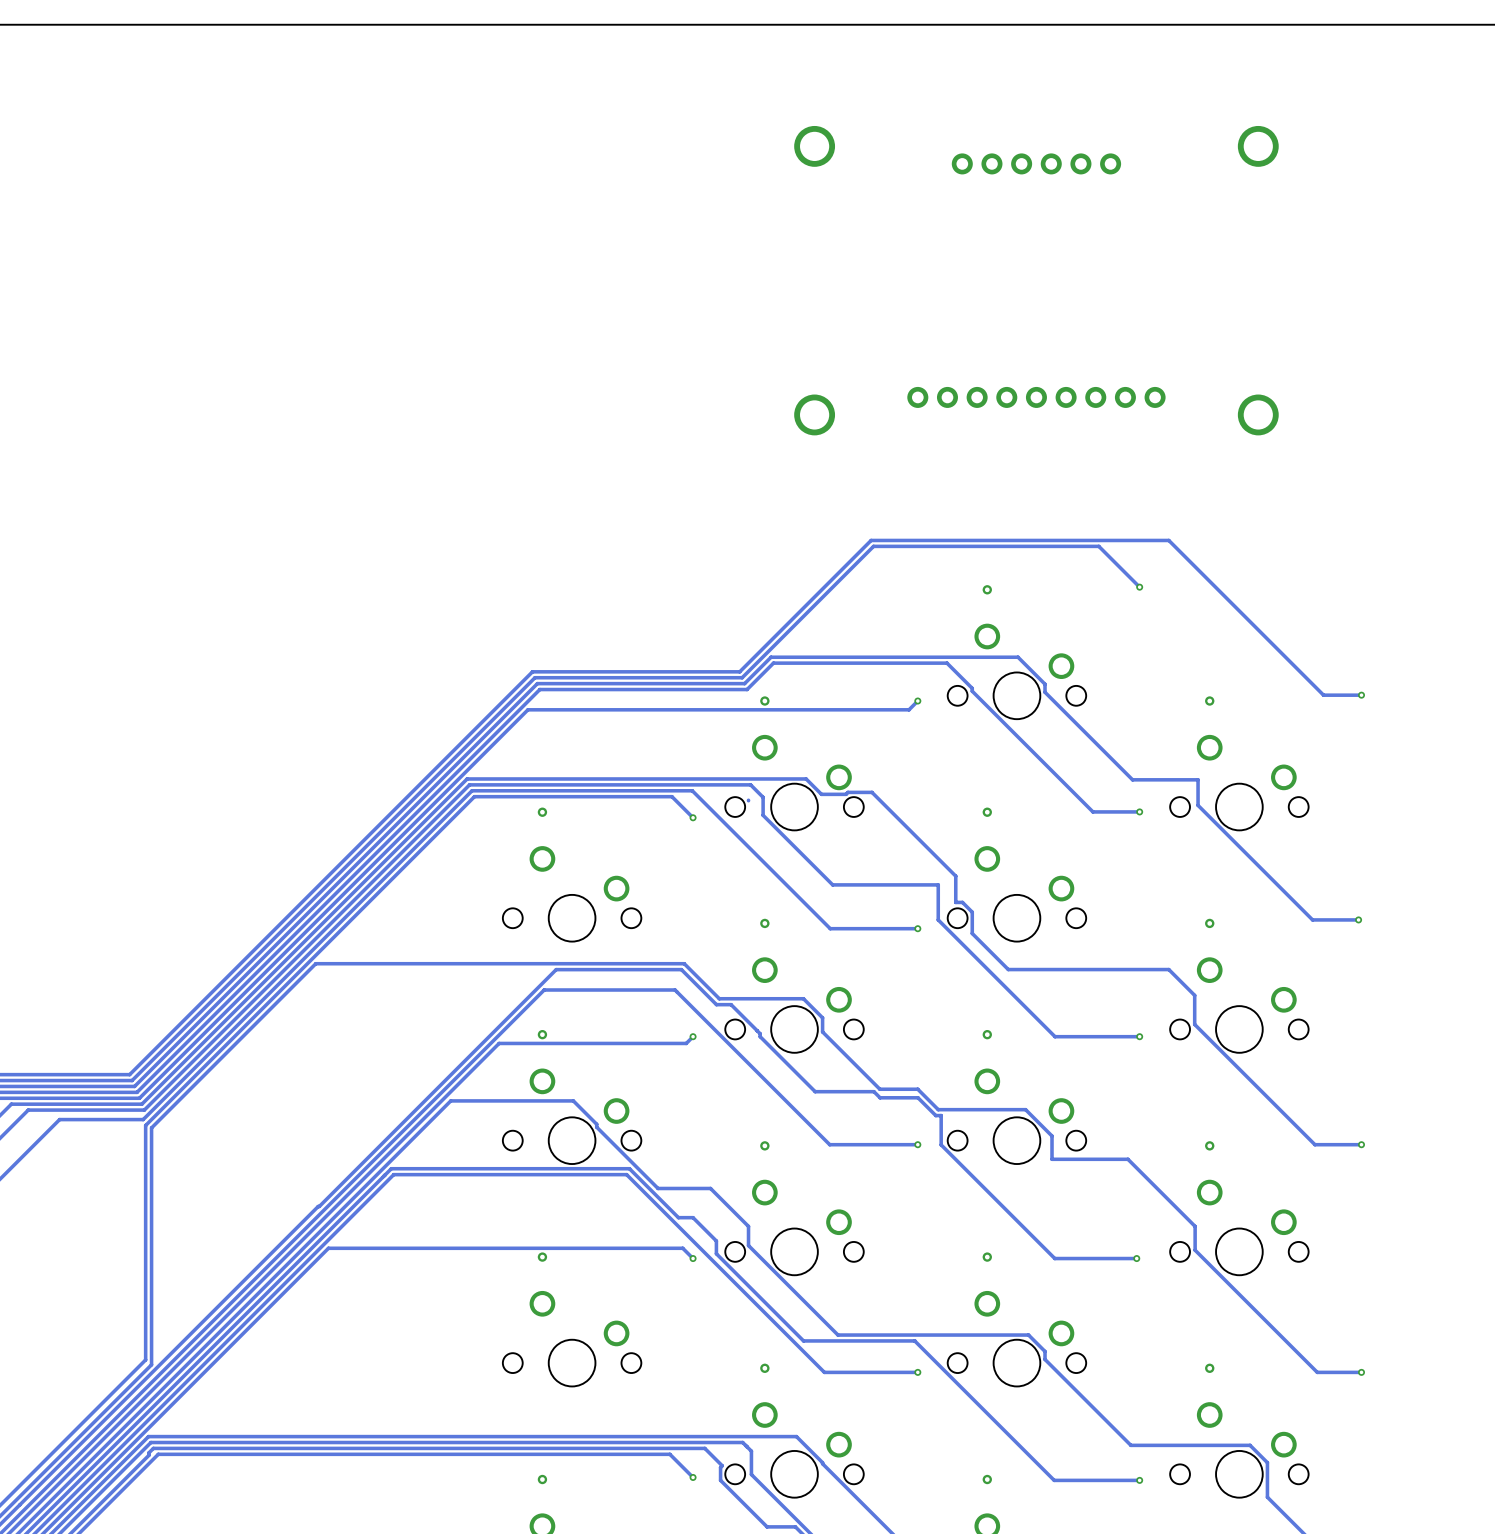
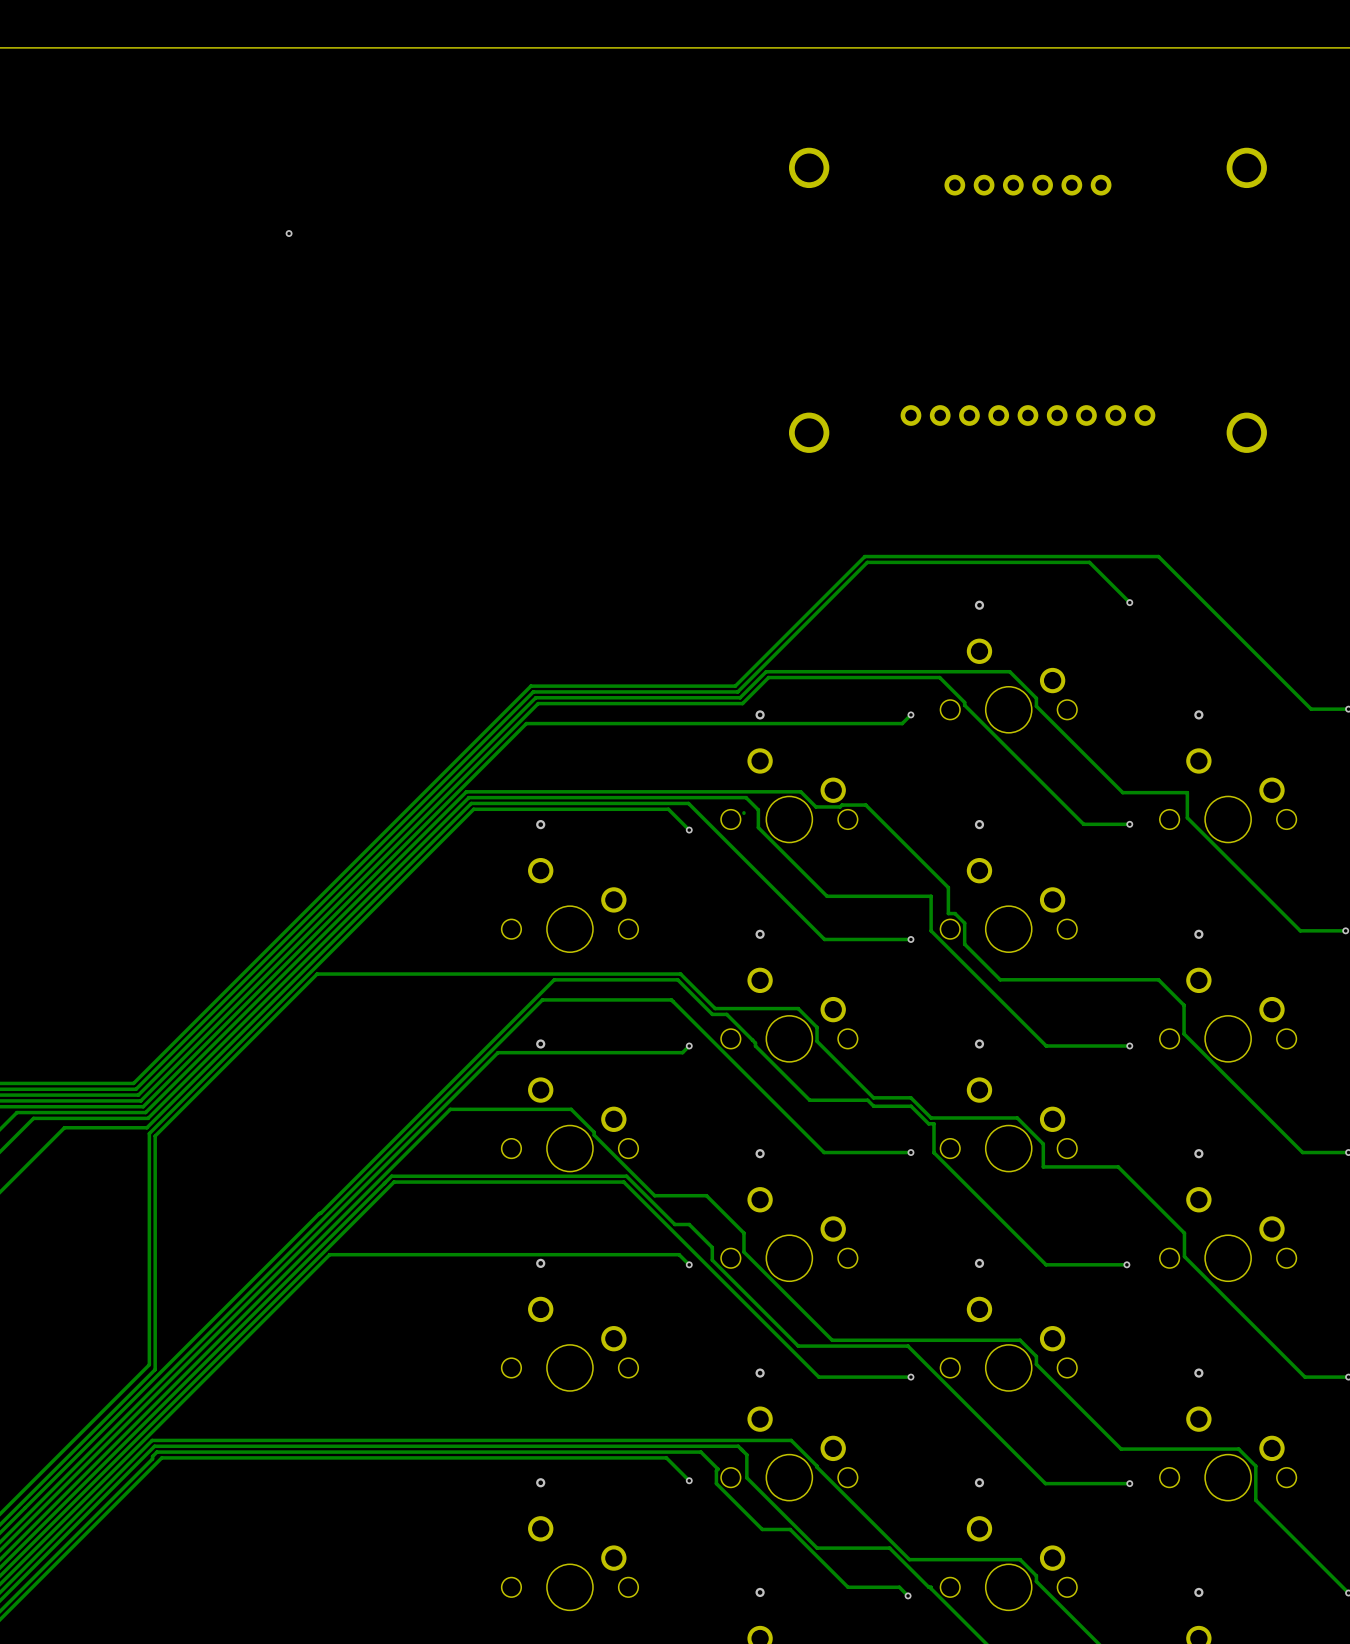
via: none -> (289, 233)

